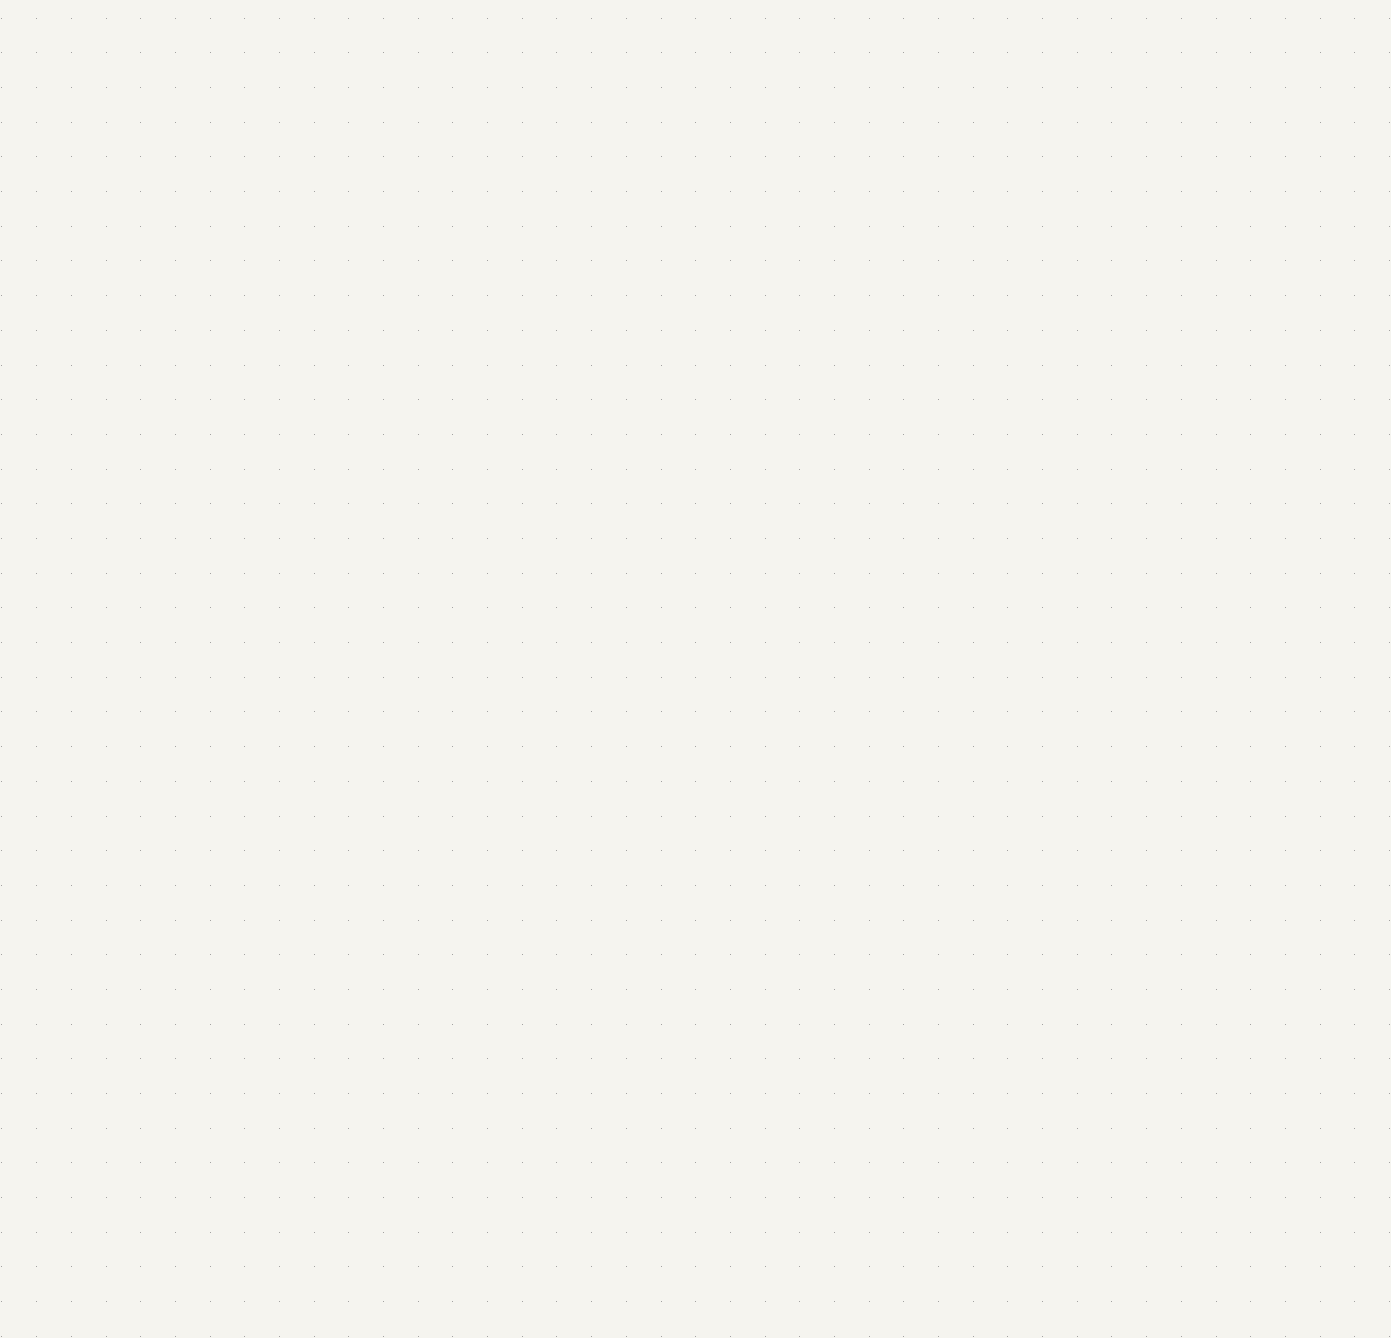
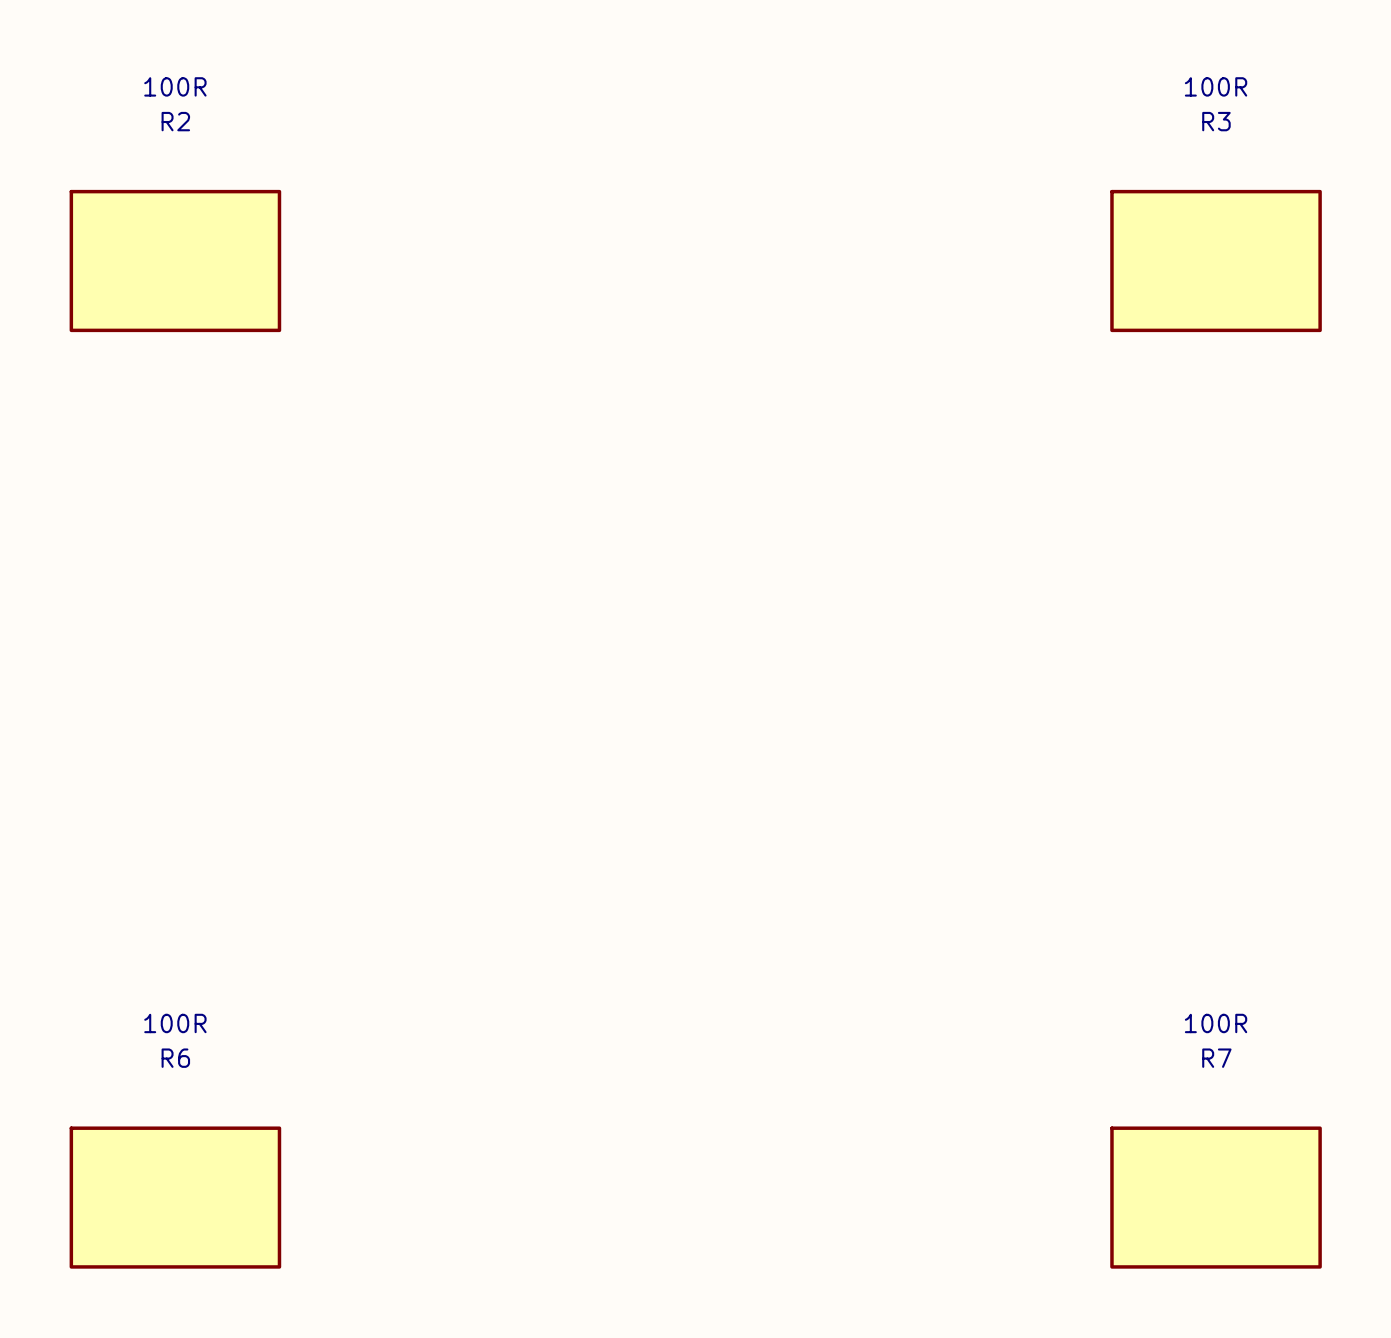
R2: none -> 100R (175, 260)
R3: none -> 100R (1216, 260)
R6: none -> 100R (175, 1197)
R7: none -> 100R (1216, 1197)

